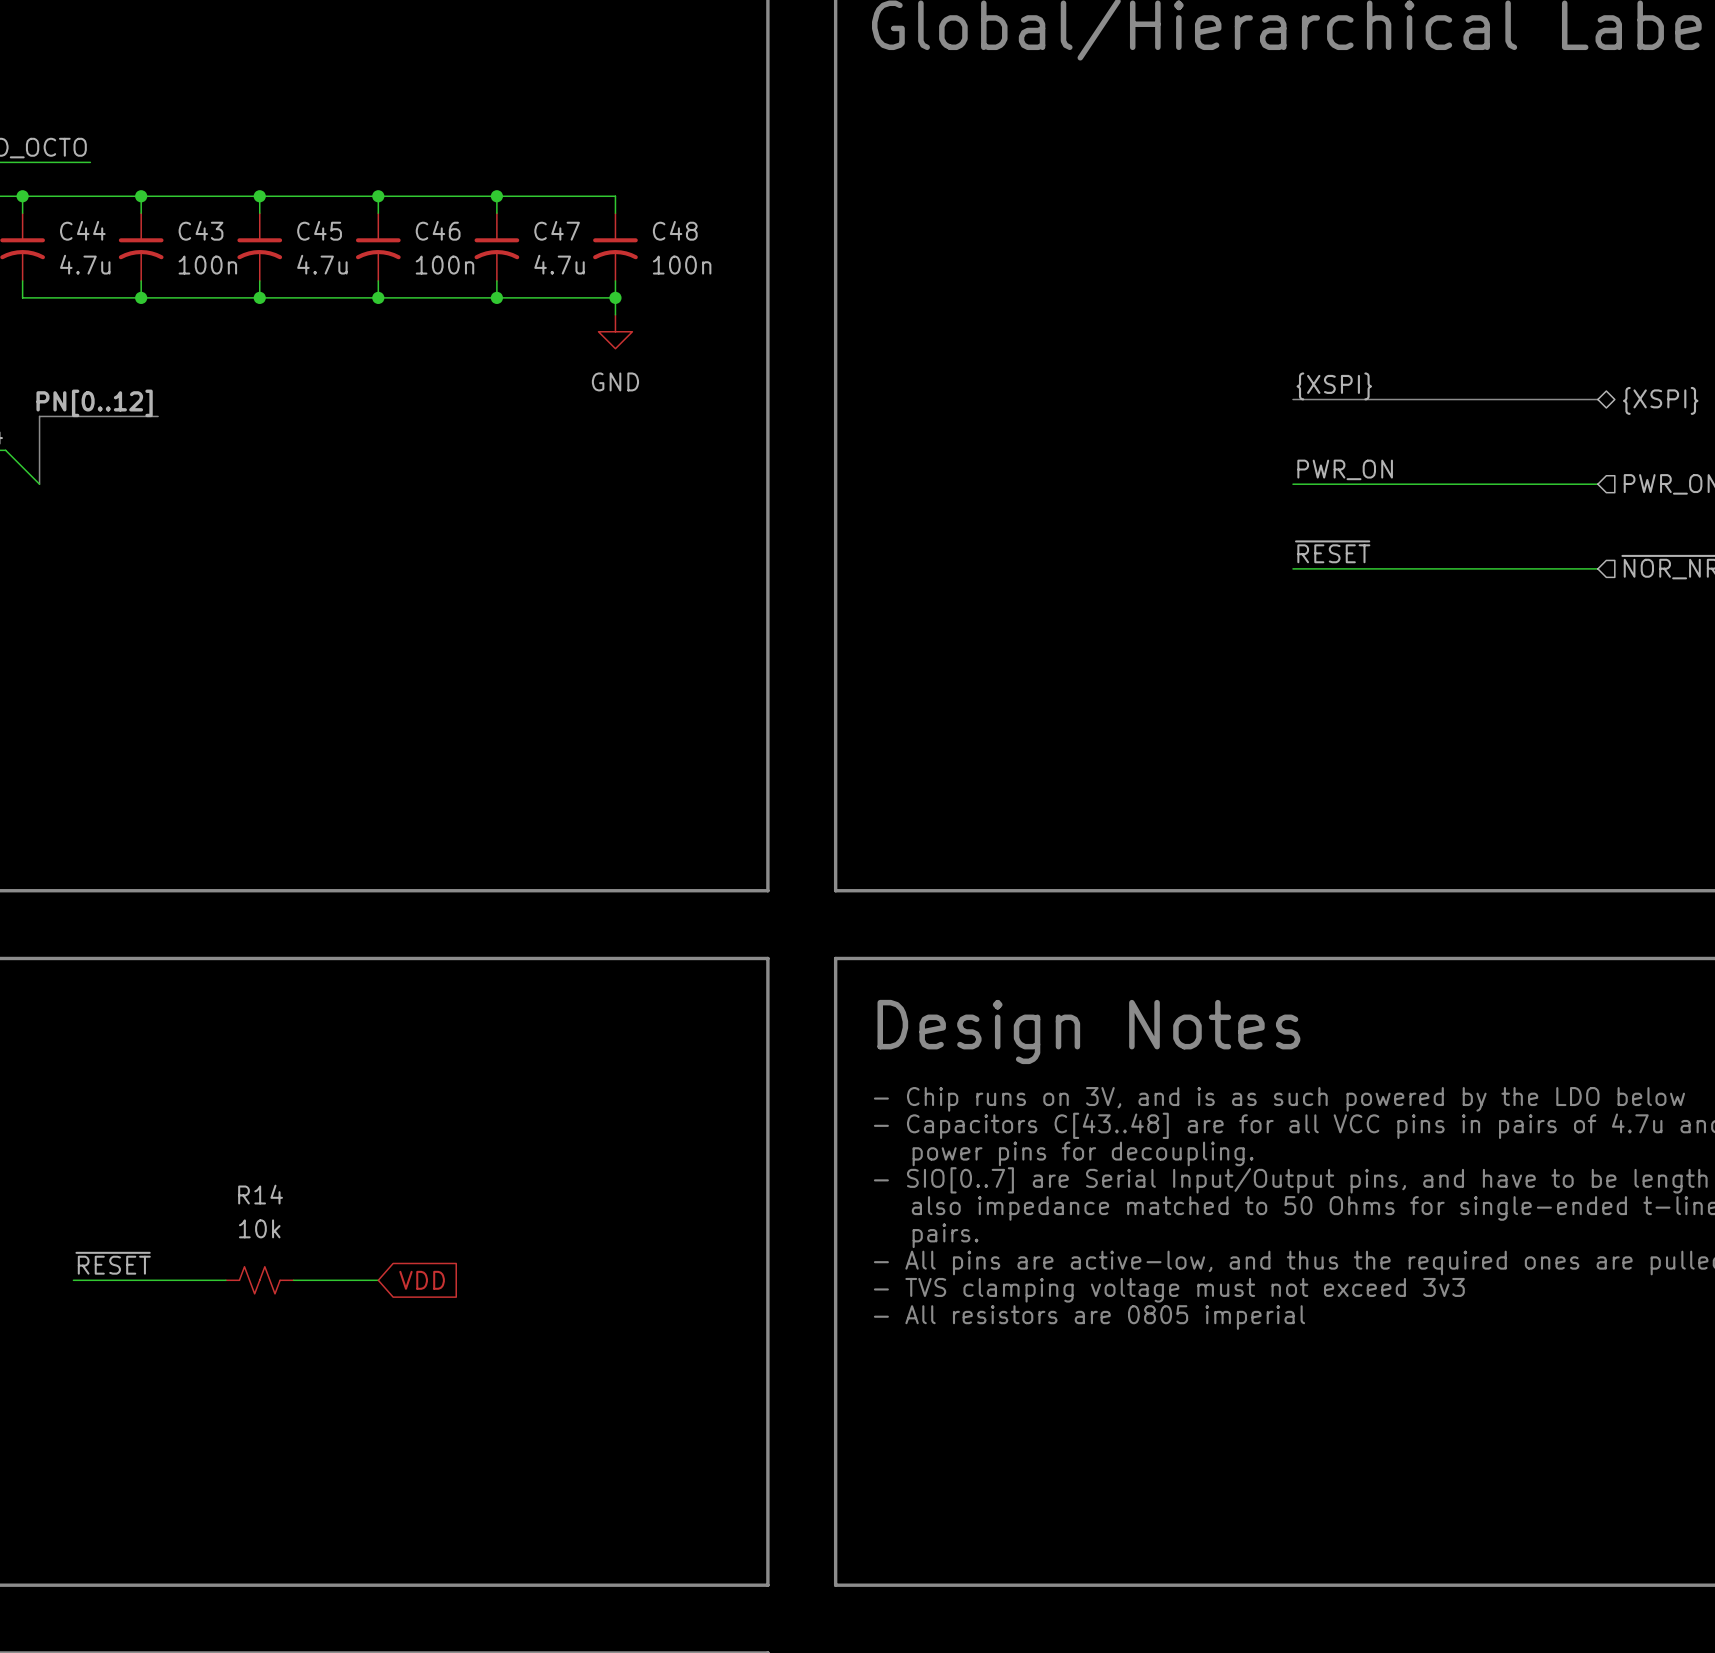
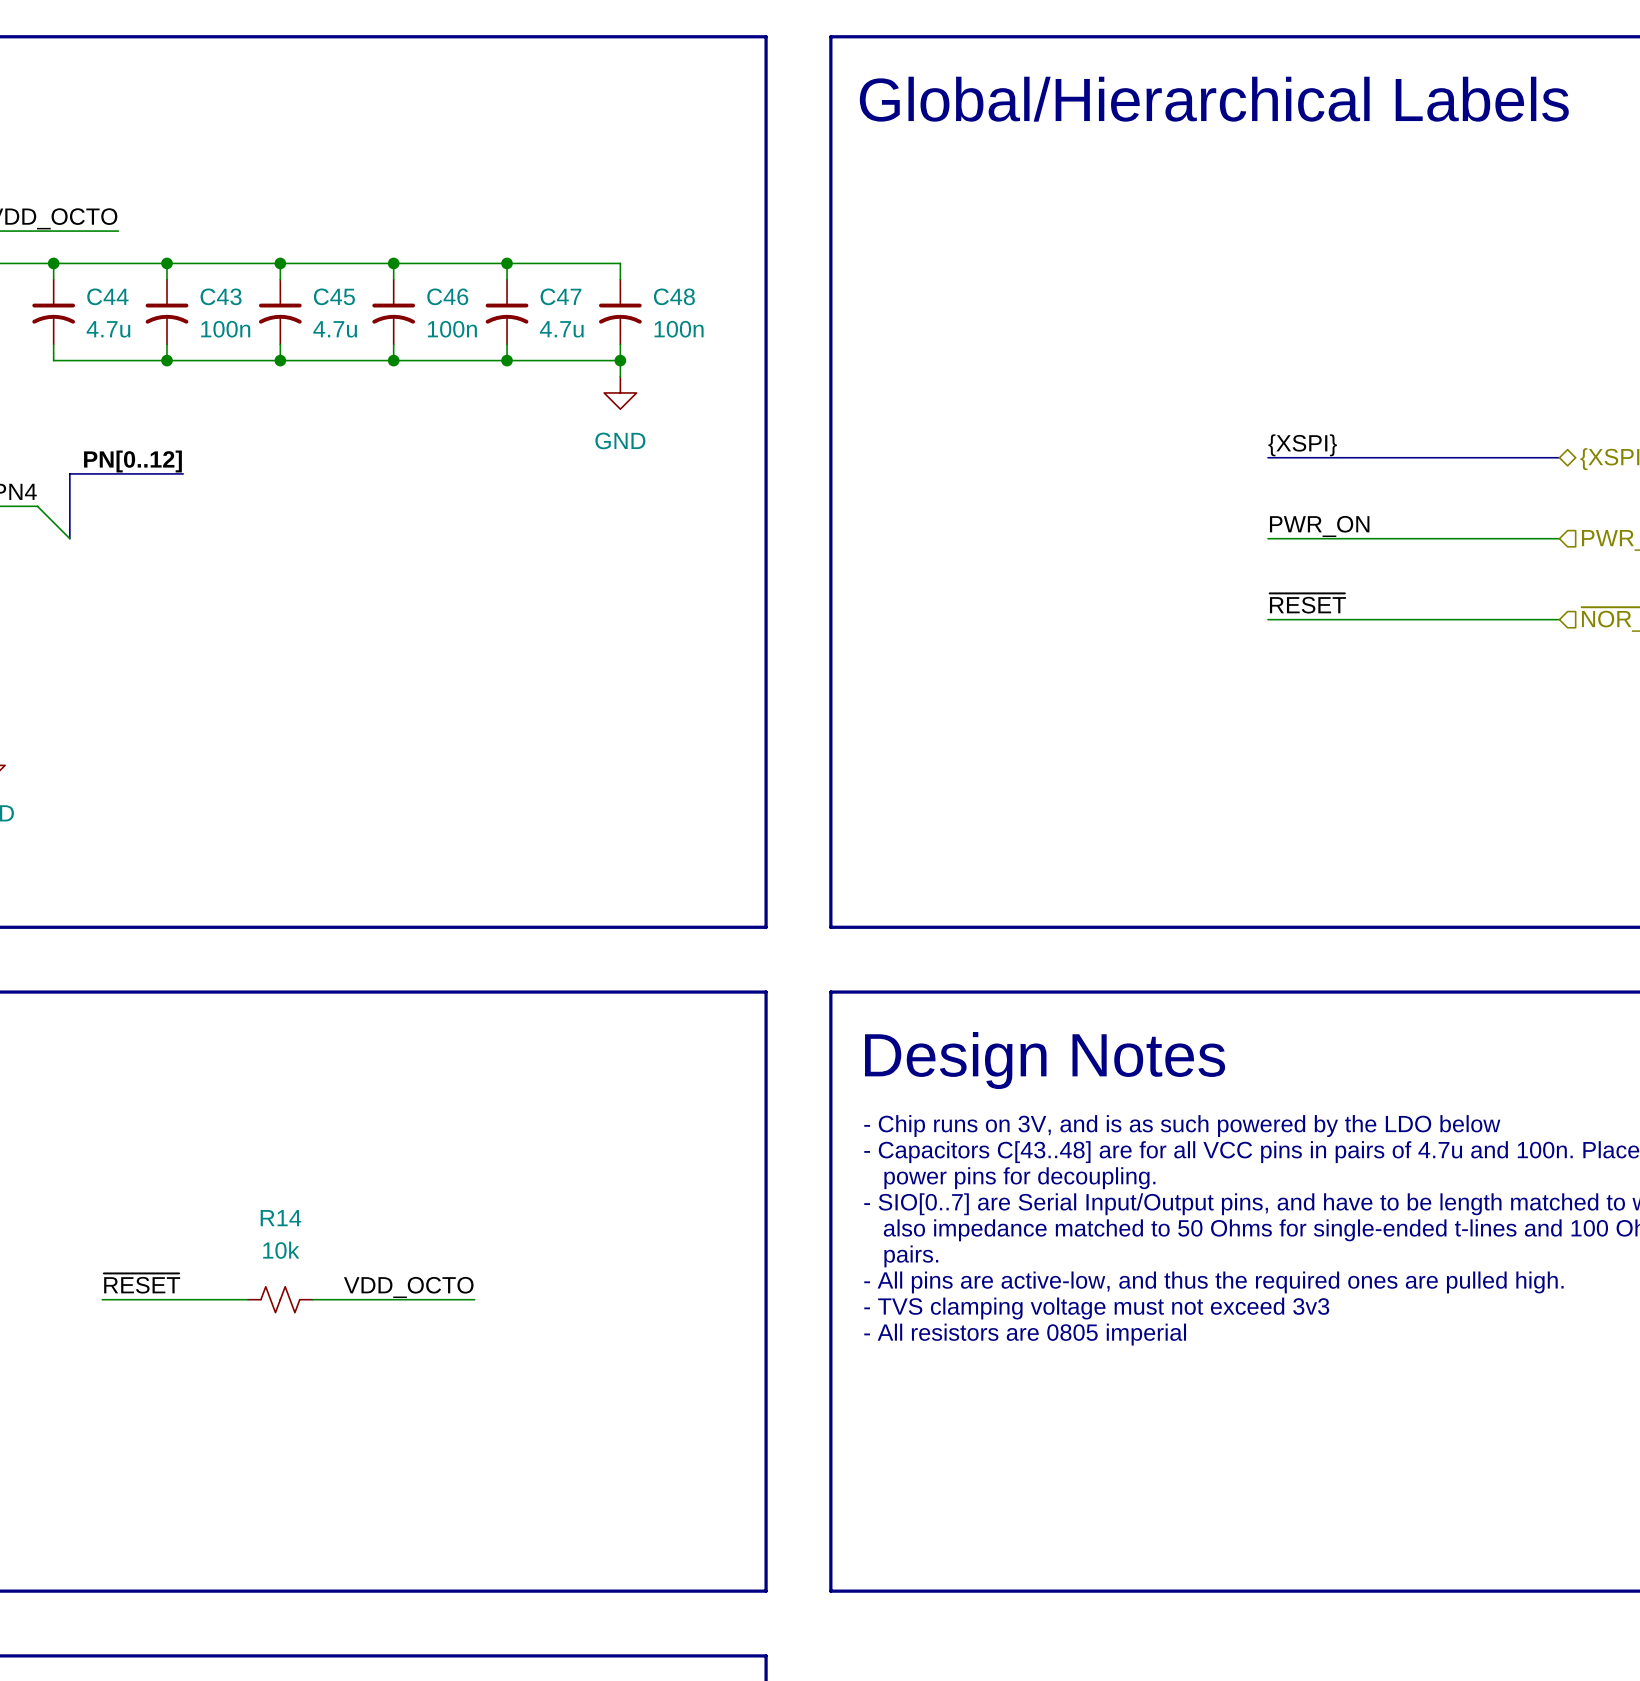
label: none -> VDD_OCTO (408, 1287)
wire: none -> (393, 1299) (474, 1299)
global label: VDD (422, 1280) -> none

